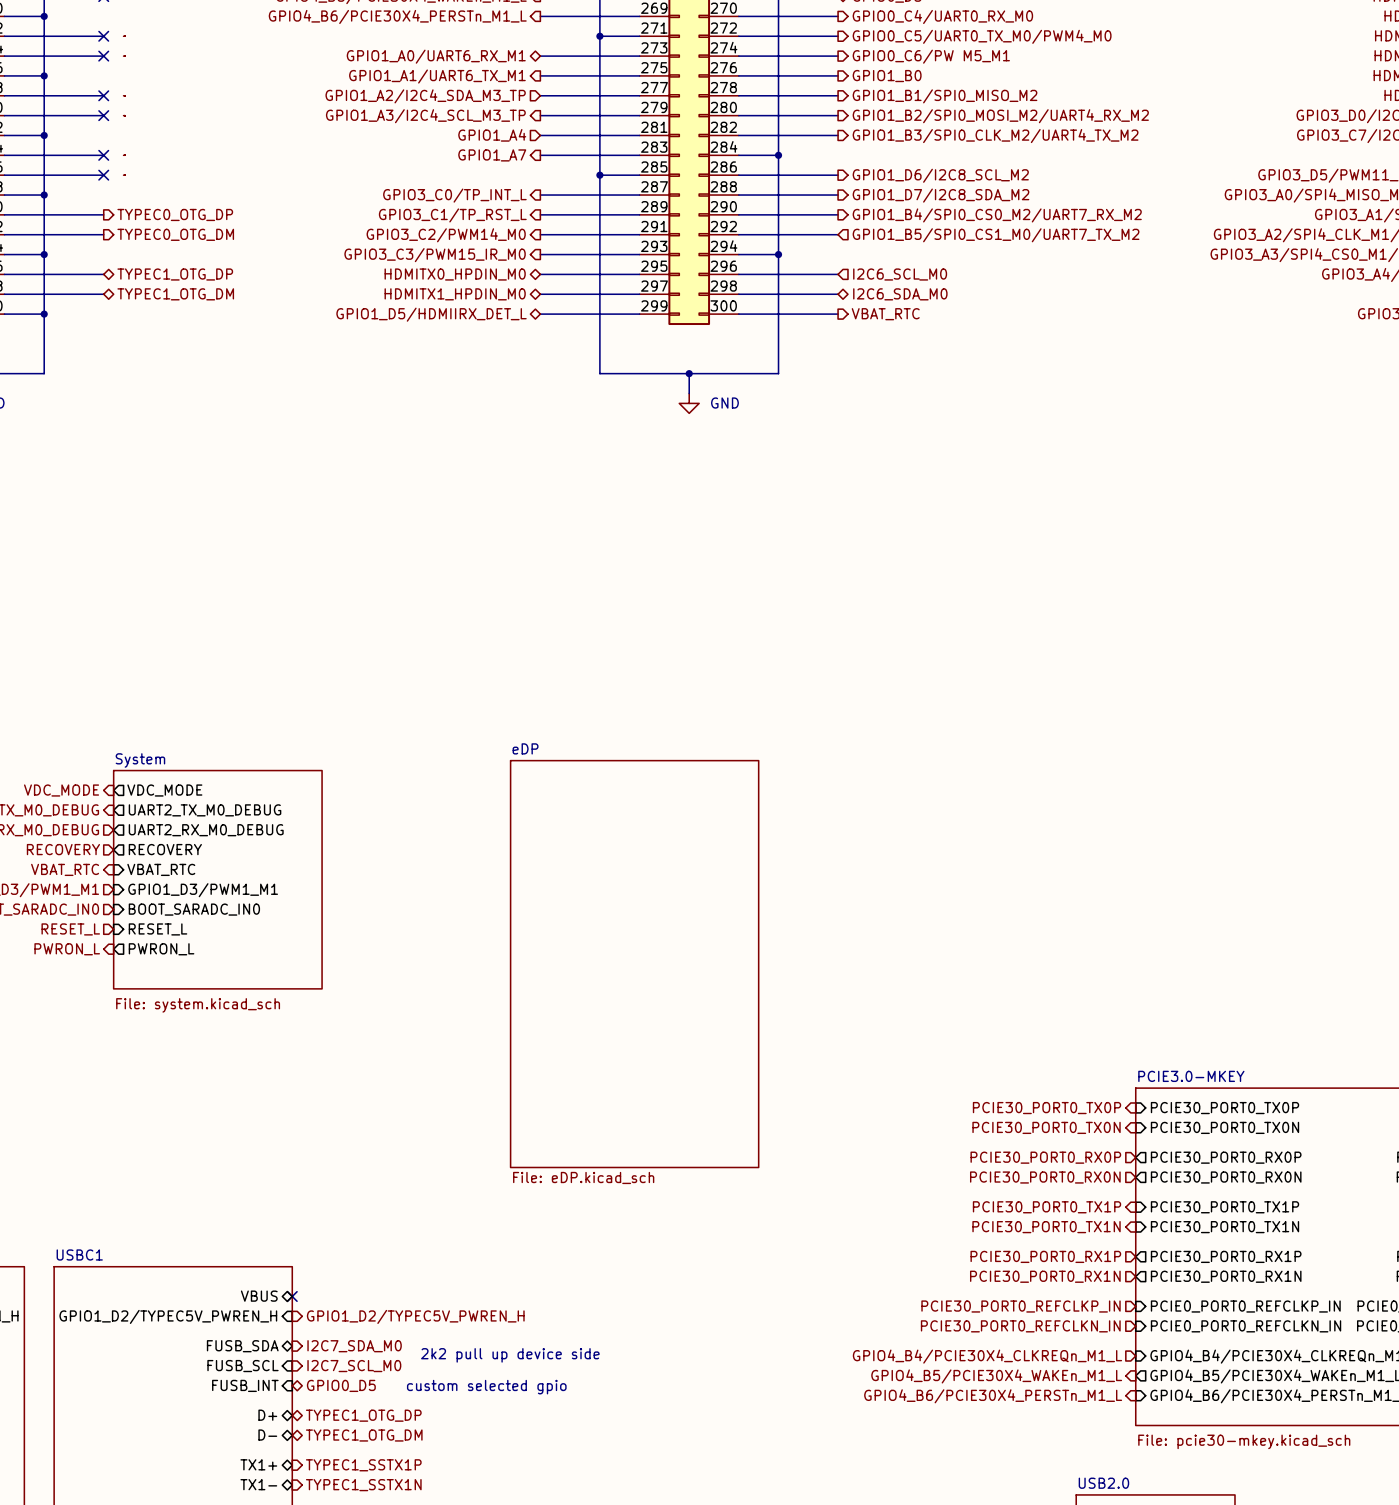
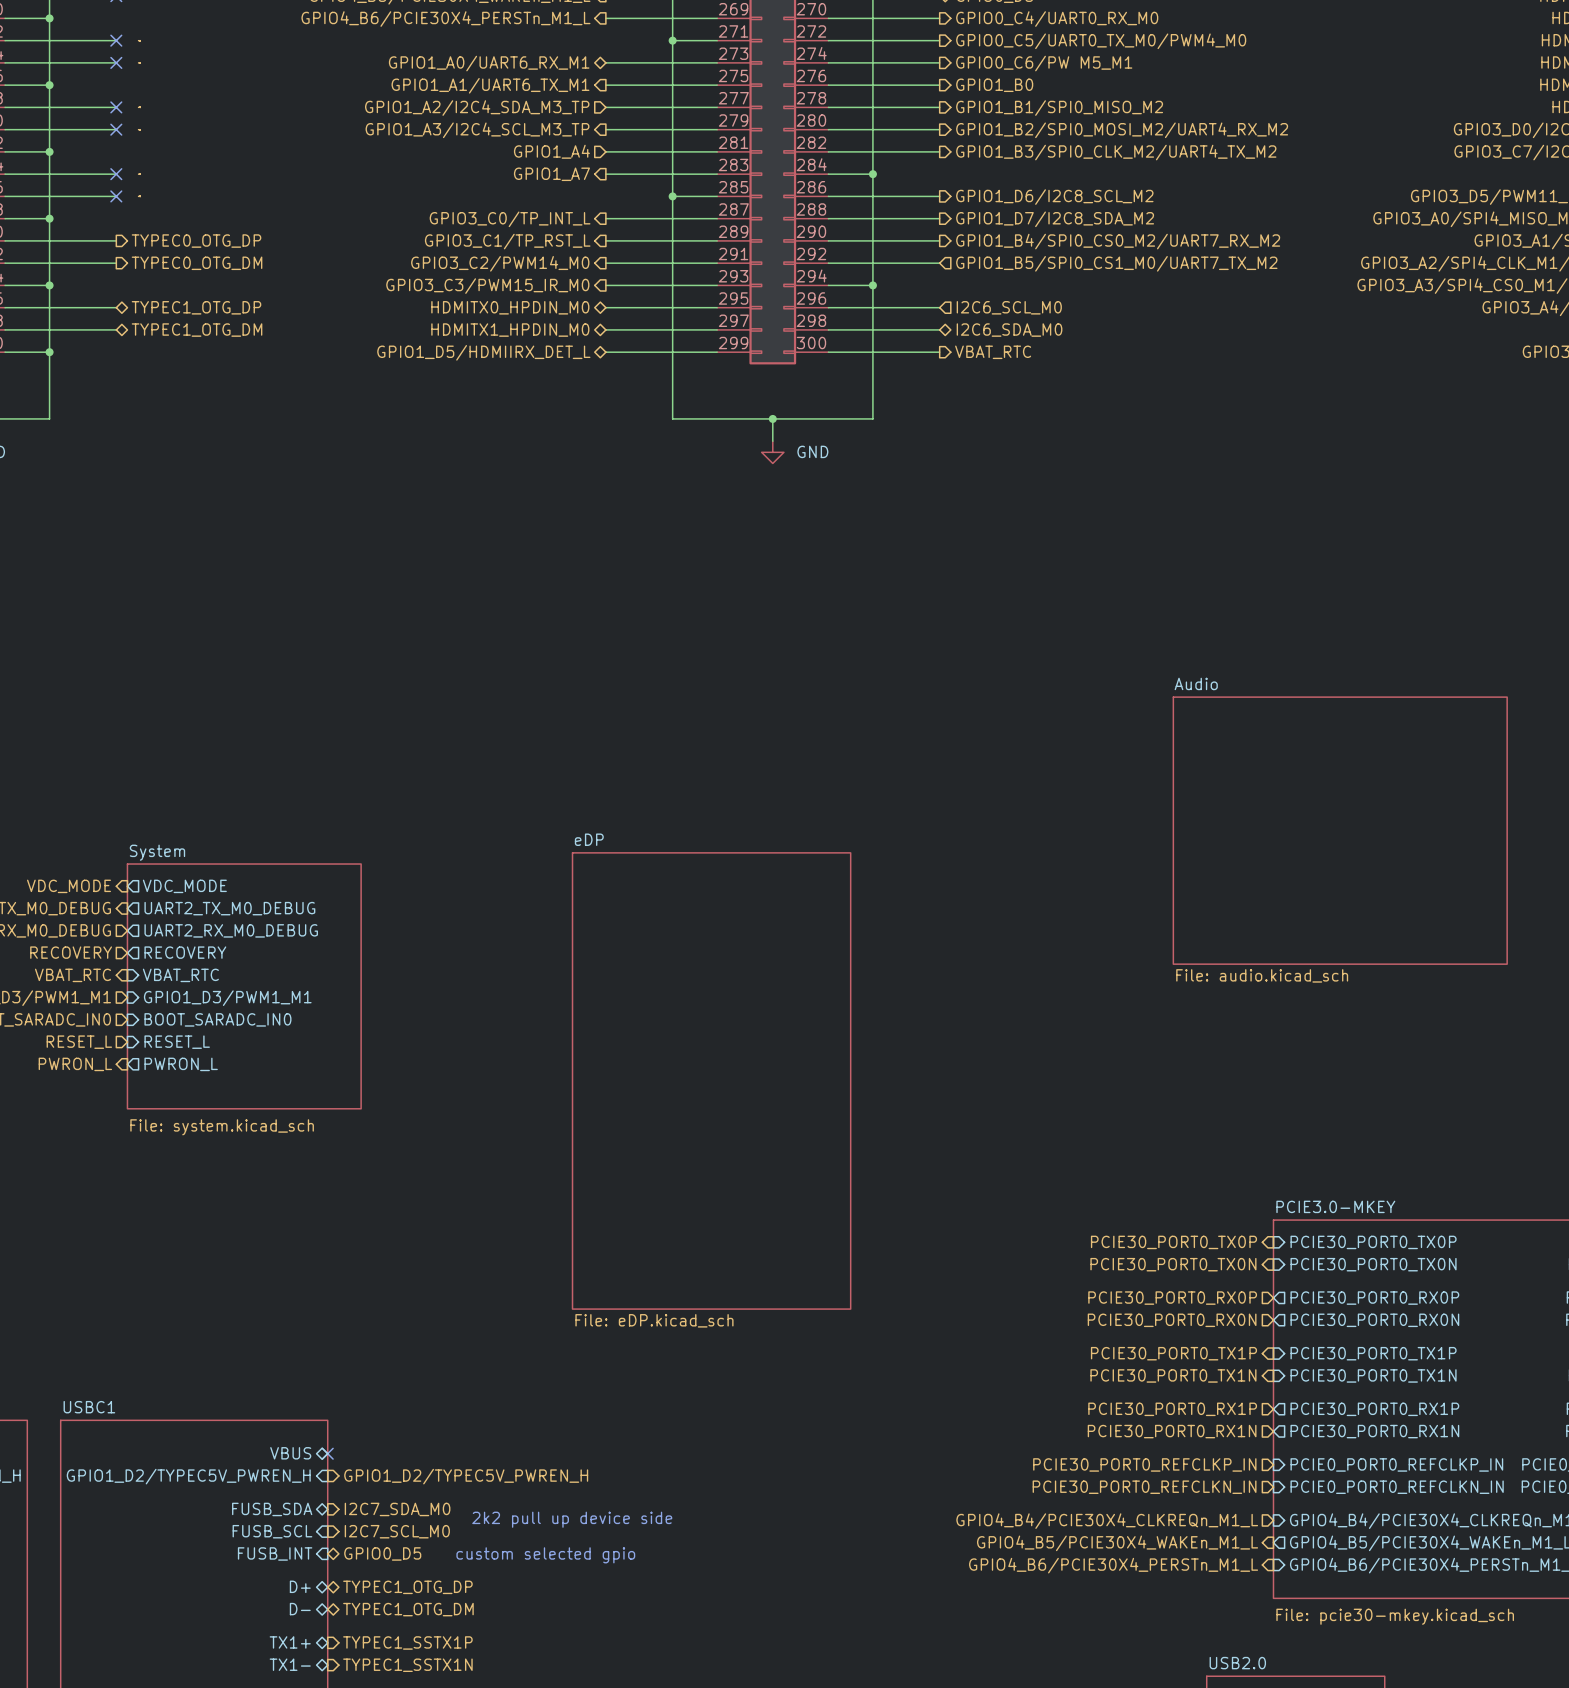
sheet Audio: none -> File: audio.kicad_sch (1340, 830)

